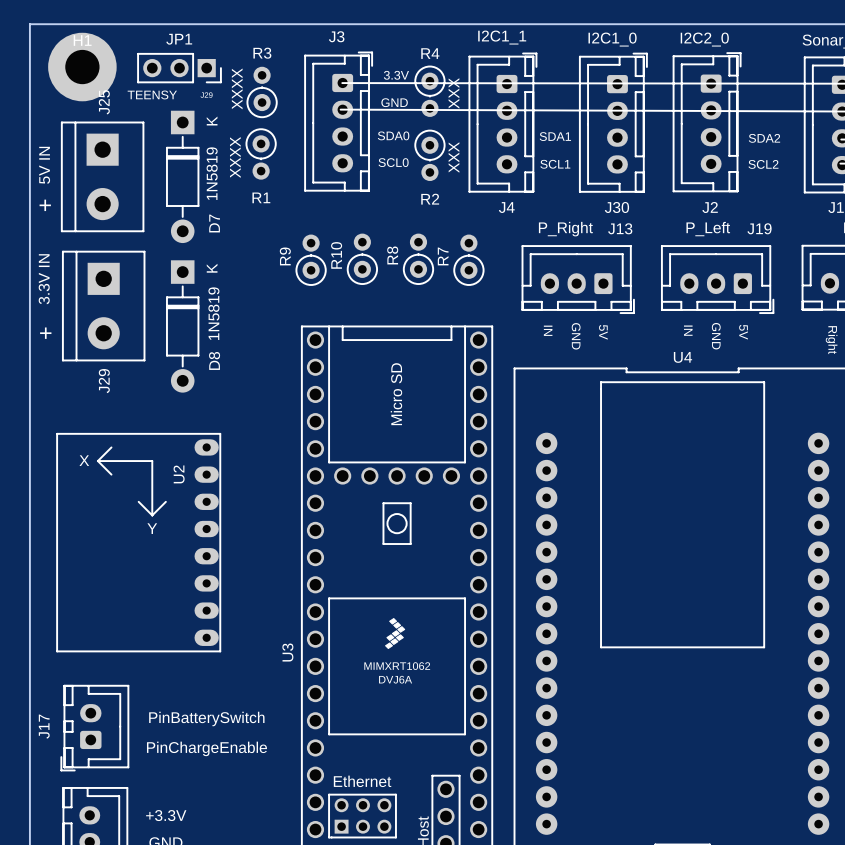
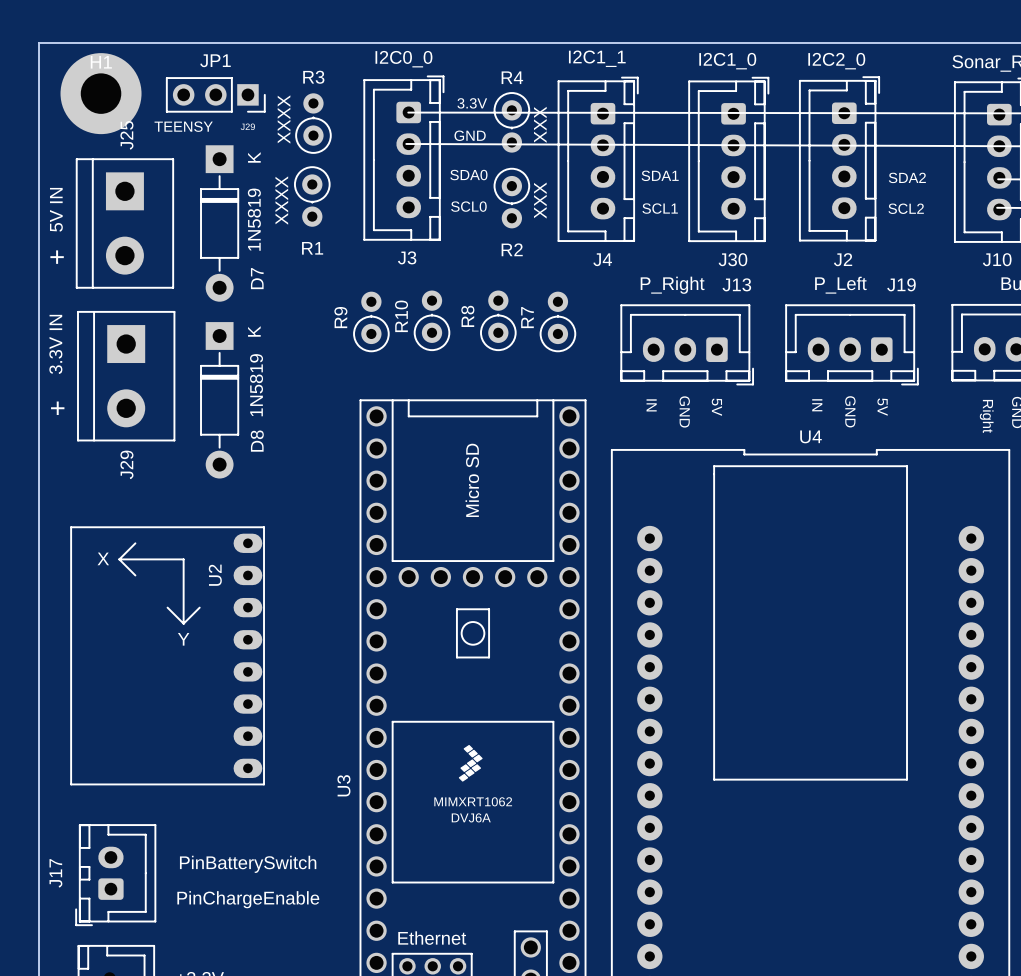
J3 name position: J3 (336, 36) -> J3 (407, 257)
J3 value: none -> I2C0_0 (403, 59)

